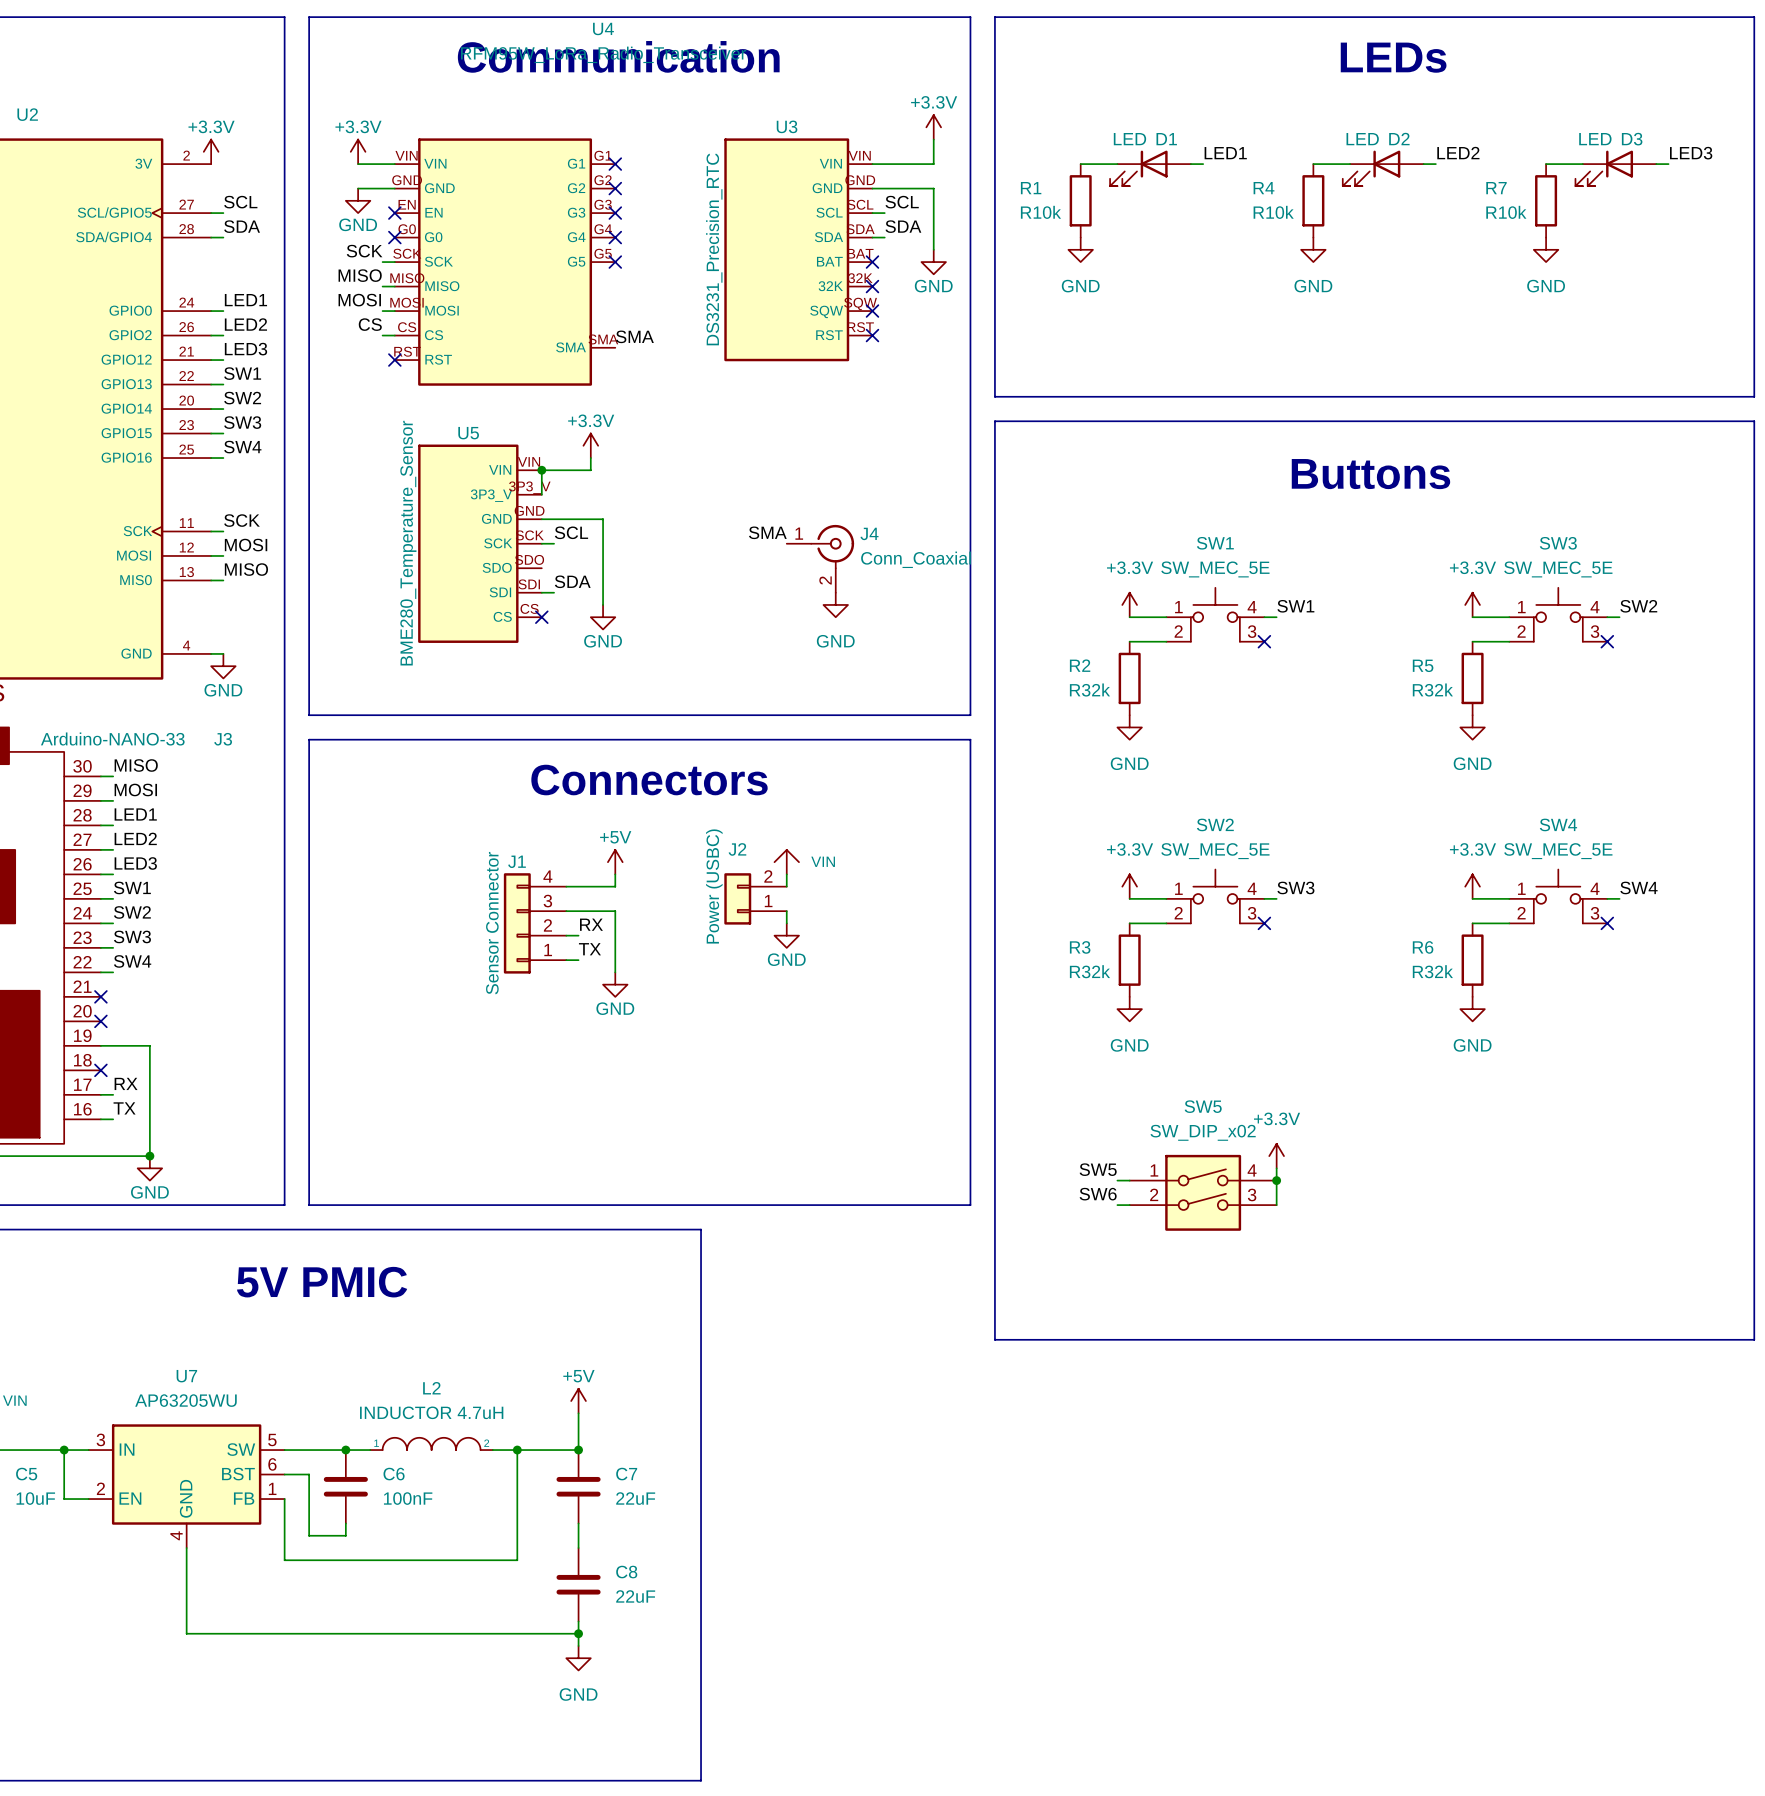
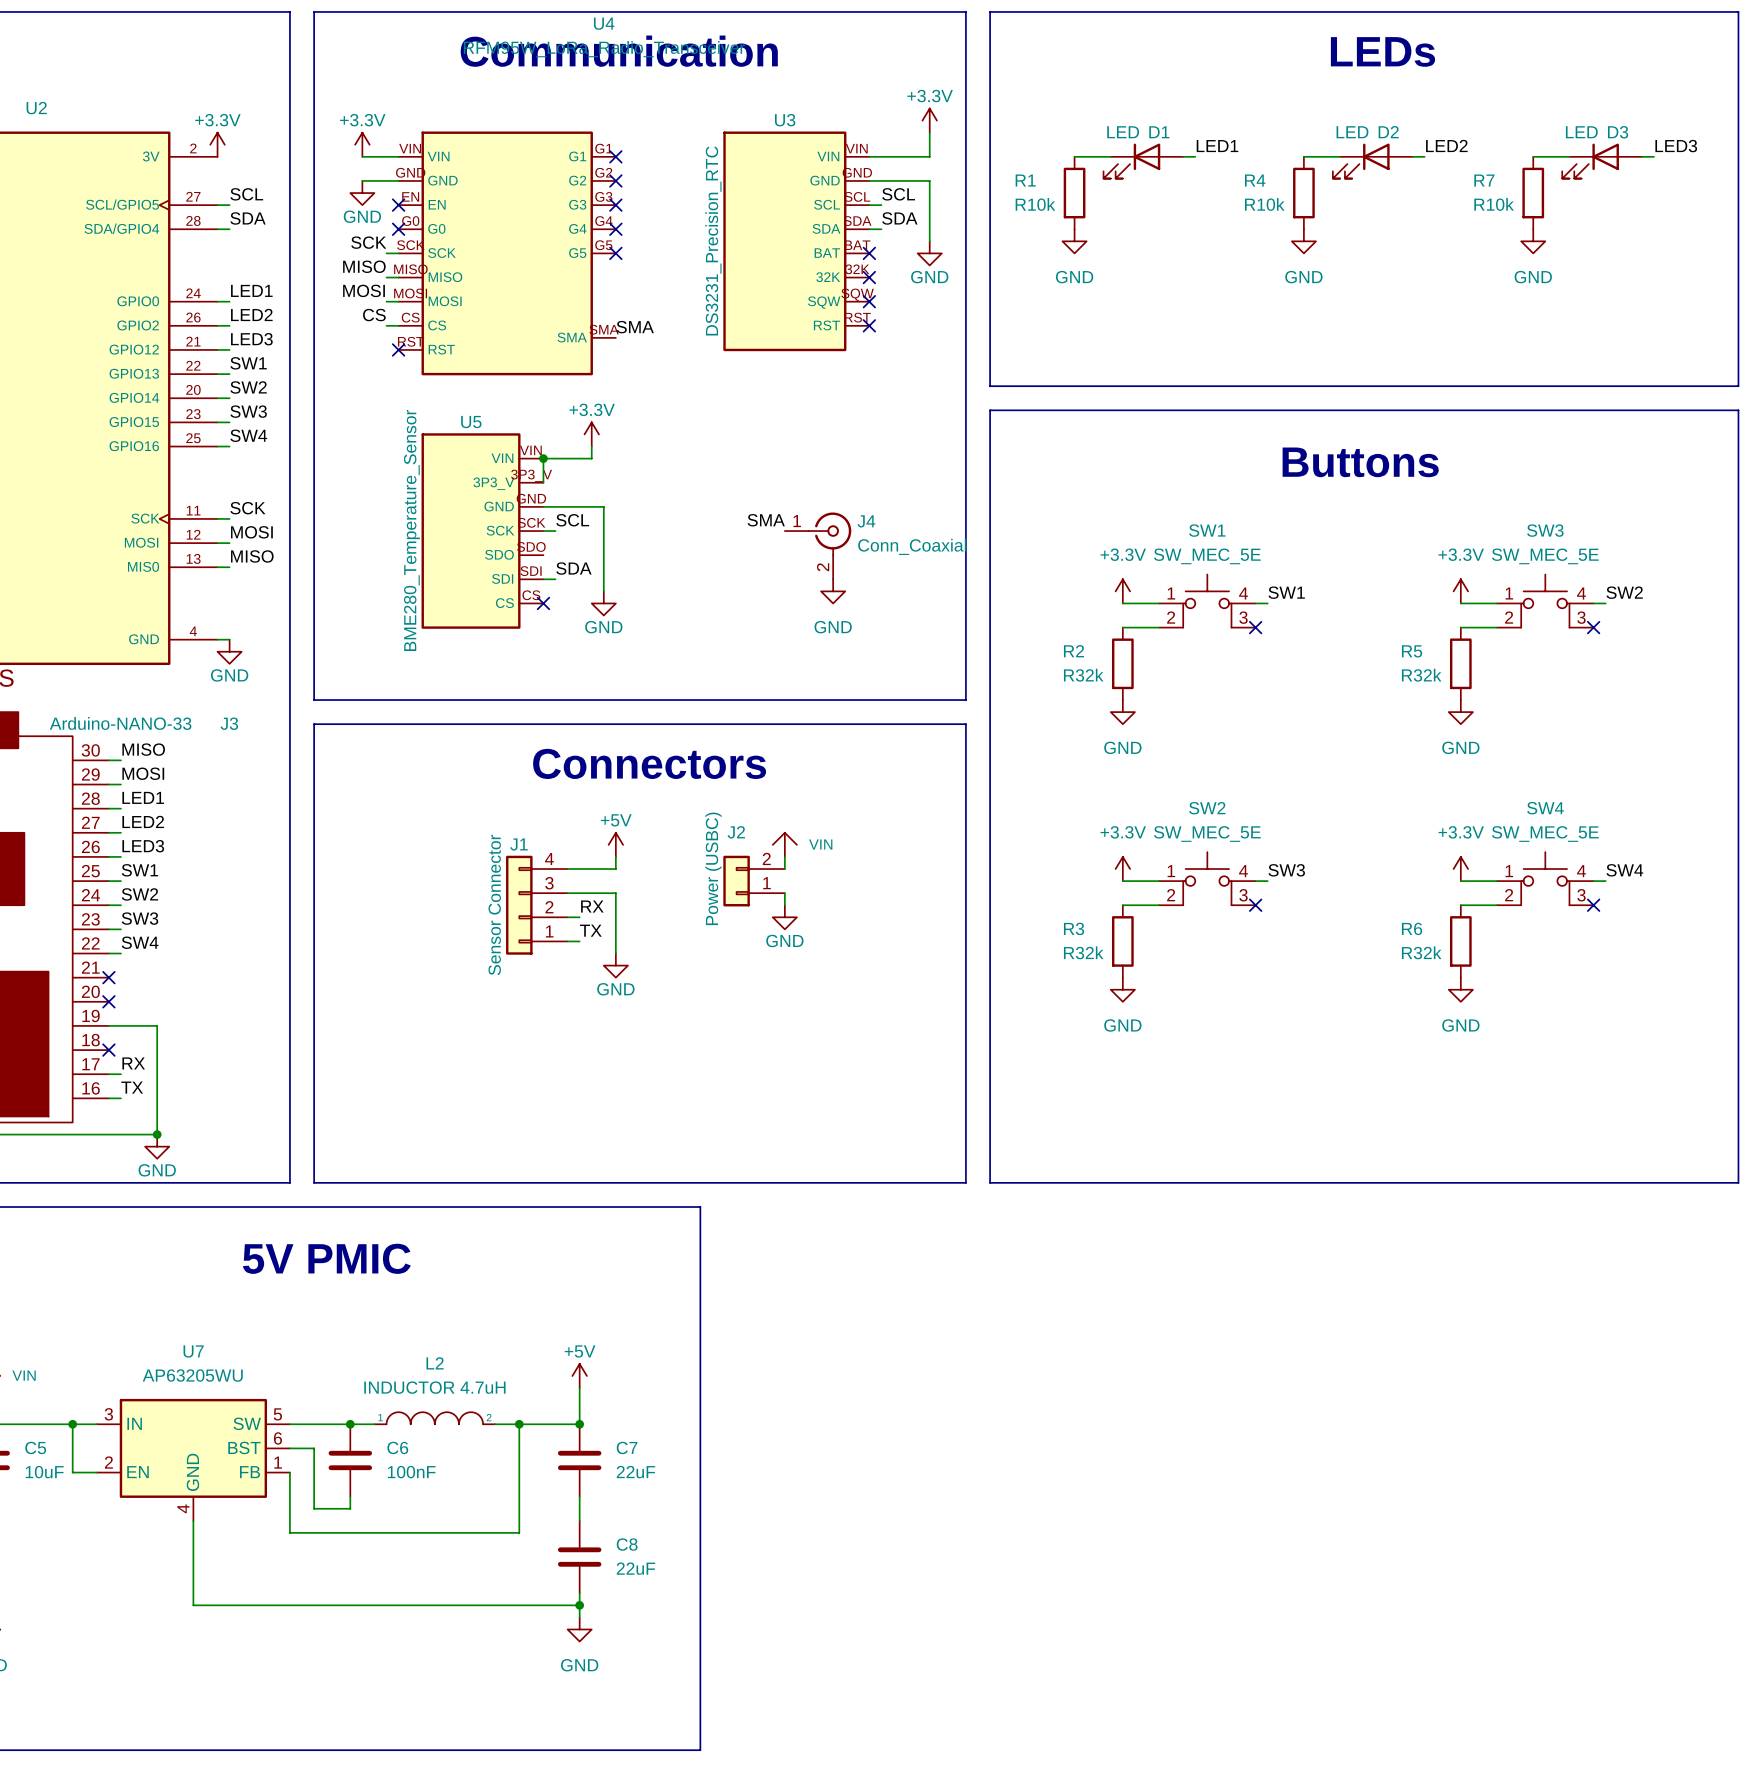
power symbol: +3.3V (1276, 1156) -> none
wire: (1276, 1168) (1276, 1205) -> none
label: SW5 (1098, 1169) -> none
wire: (1117, 1180) (1129, 1180) -> none
junction: (1276, 1180) -> none
SW5: SW_DIP_x02 (1203, 1192) -> none
label: SW6 (1098, 1194) -> none
line: (994, 1205) (994, 1339) (1754, 1339) (1754, 1205) -> (990, 1182) (1738, 1182)

